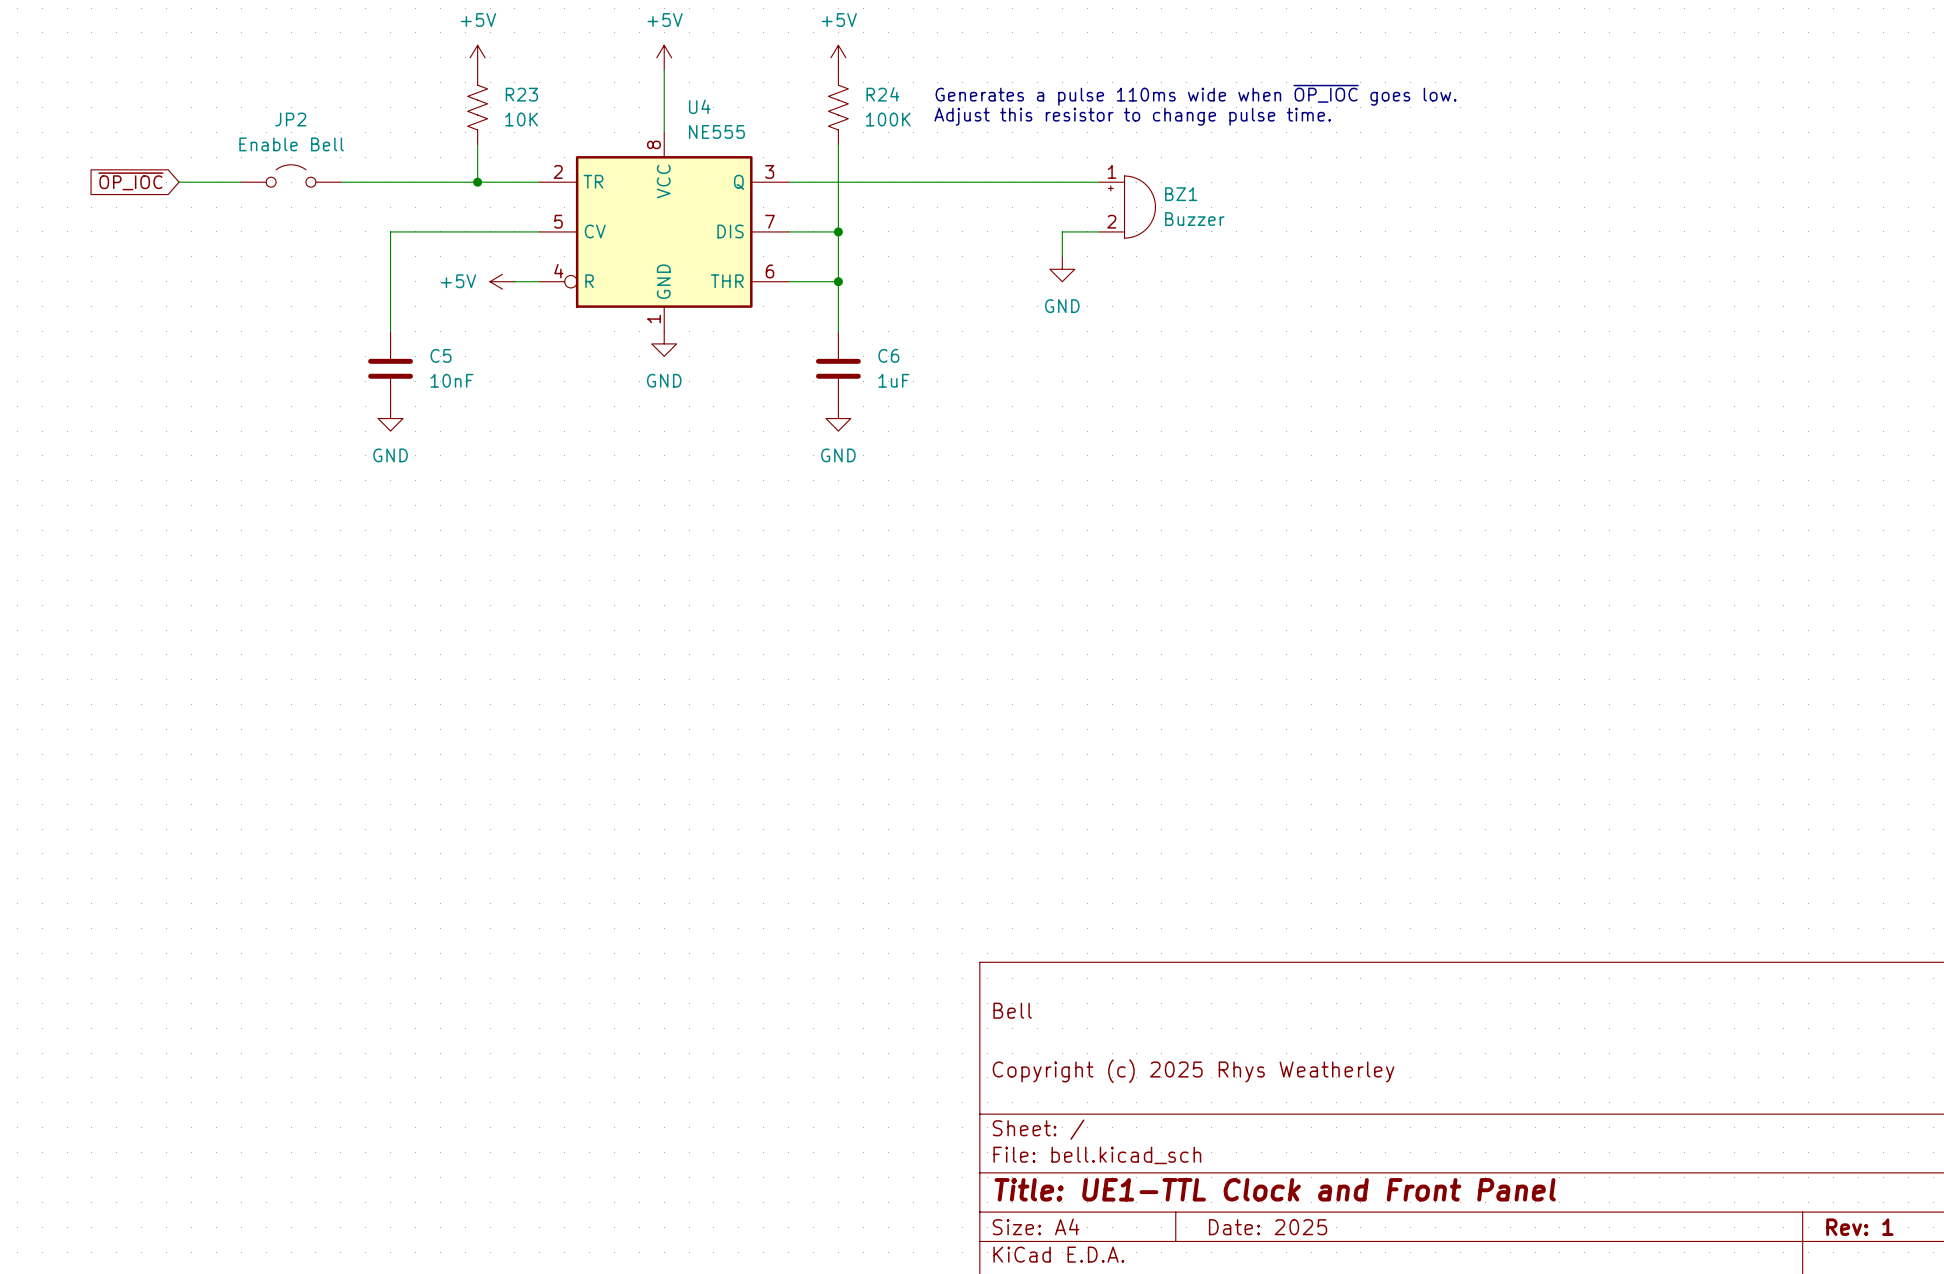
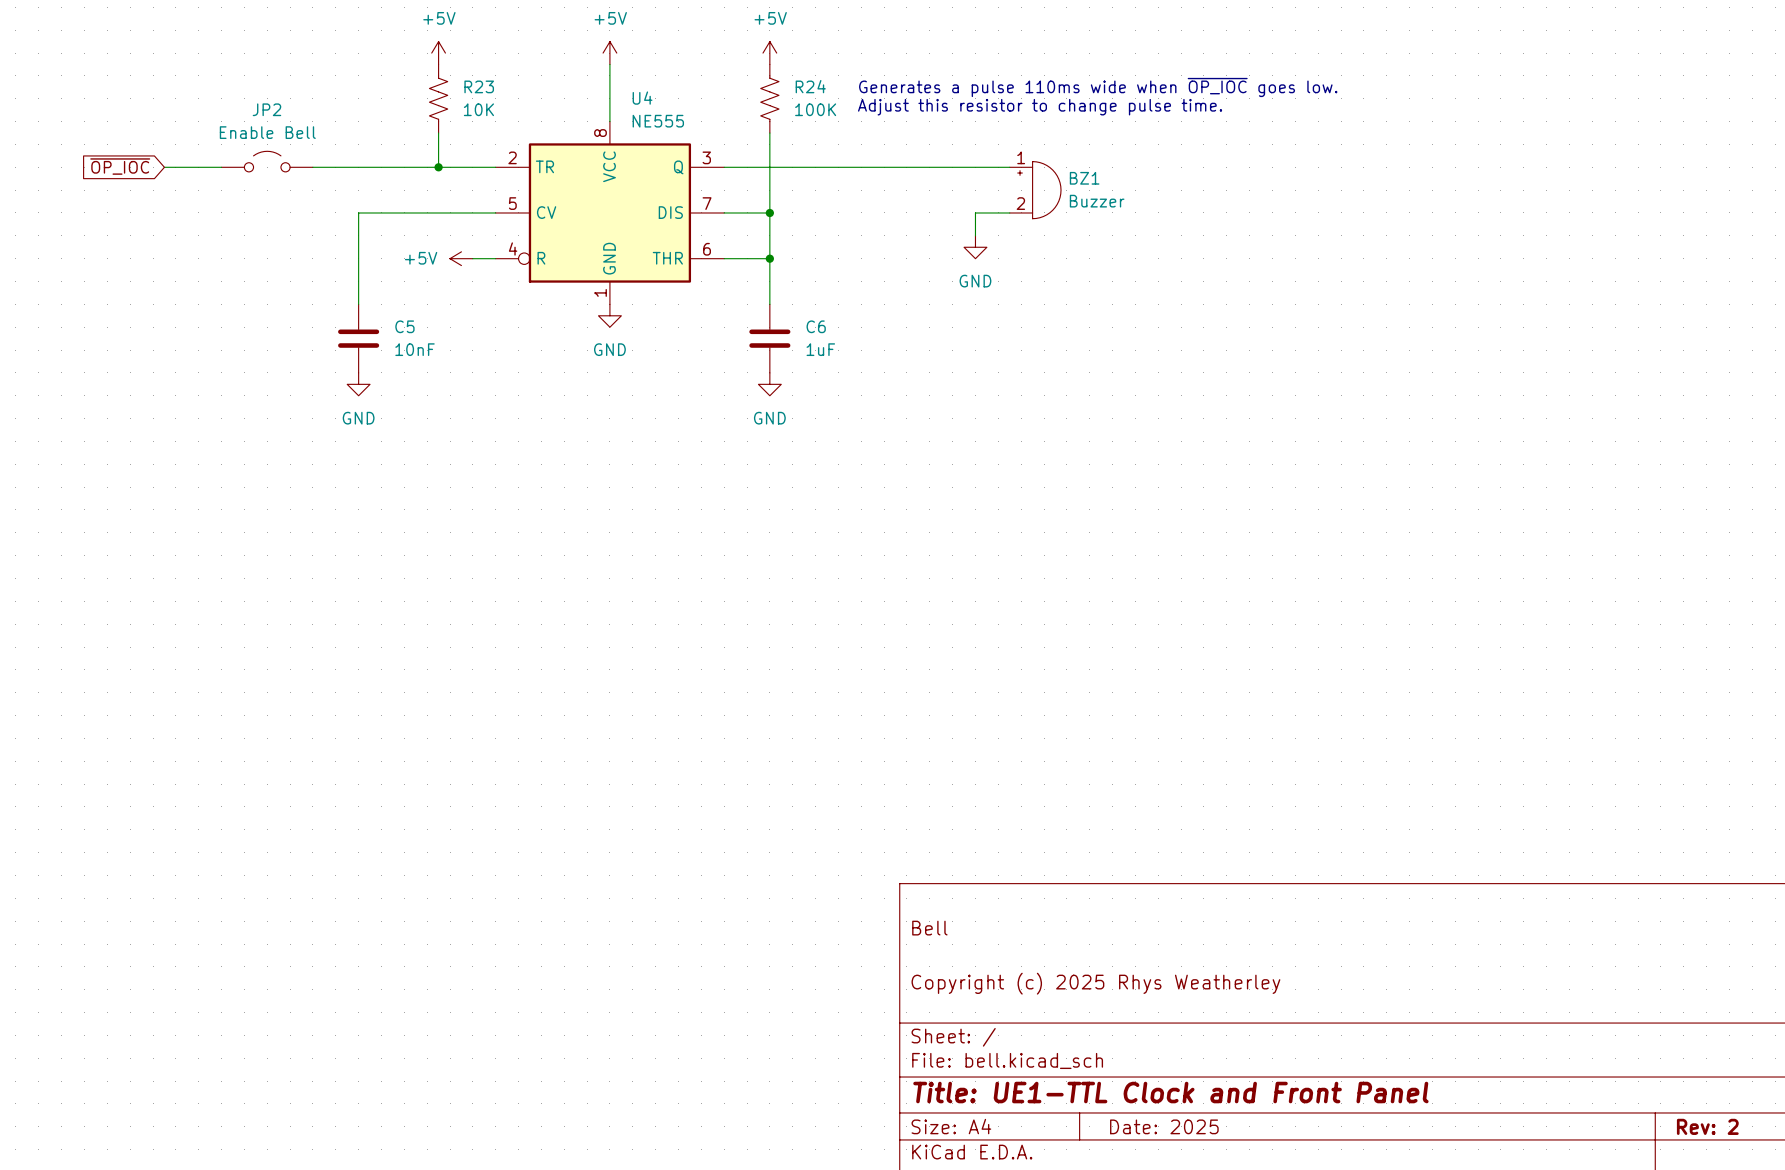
title block: Rev: 1 (1859, 1227) -> Rev: 2 (1707, 1126)

